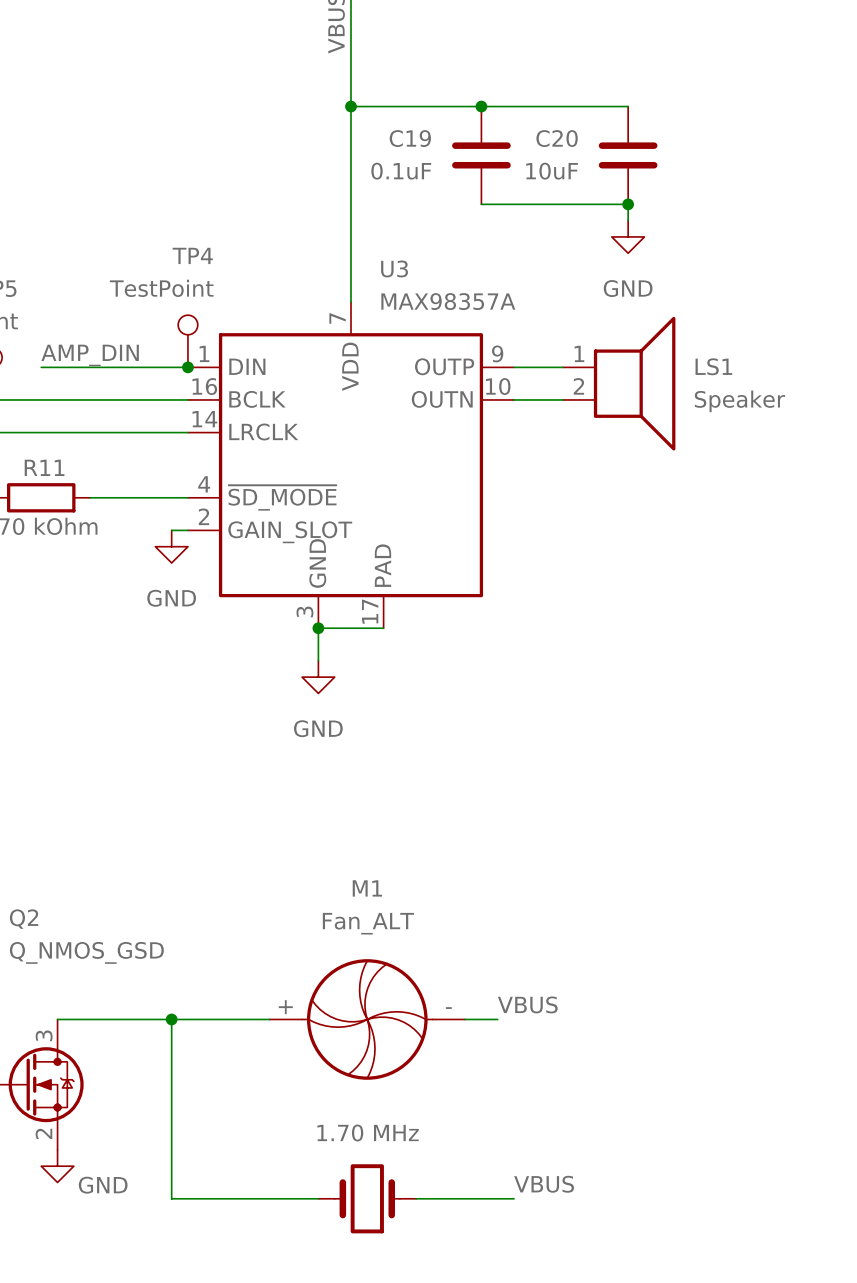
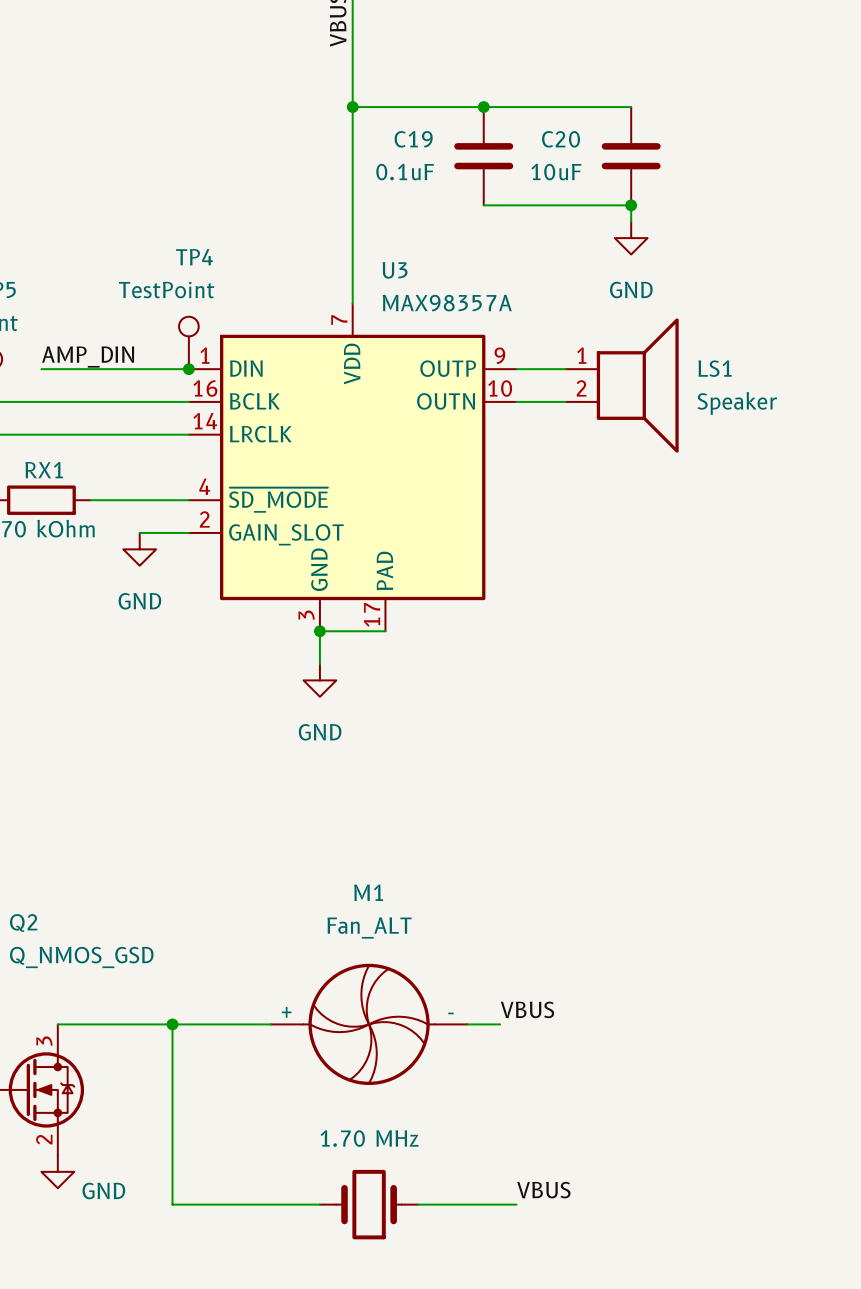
R11 name: R11 (44, 467) -> RX1 (44, 470)
wire: none -> (139, 532) (172, 532)
power symbol position: GND (171, 546) -> GND (139, 549)

